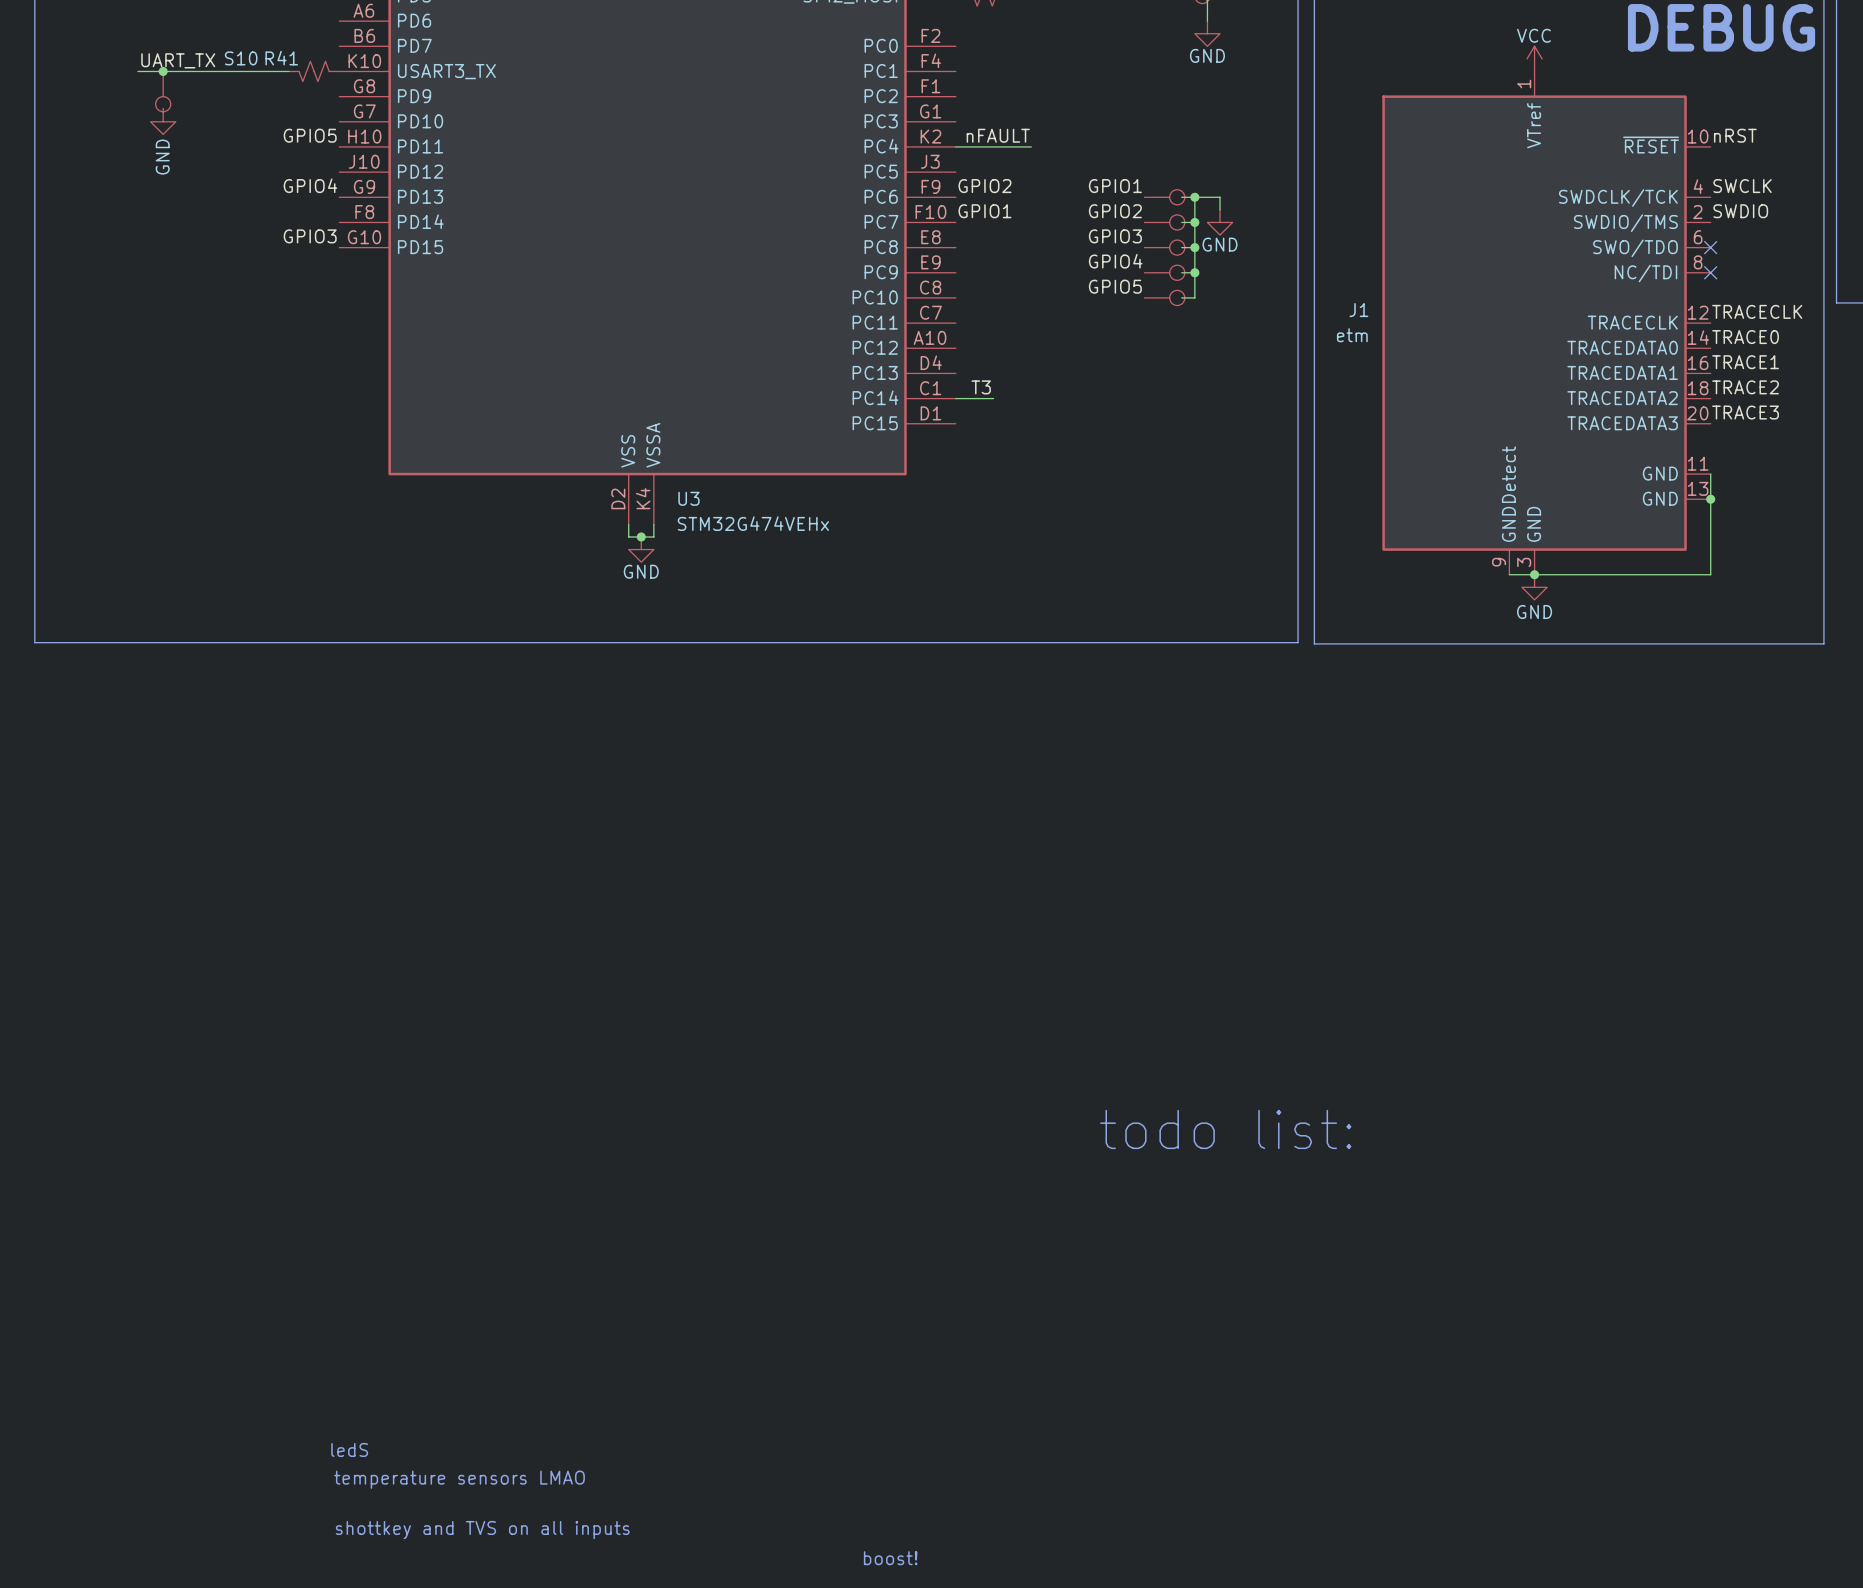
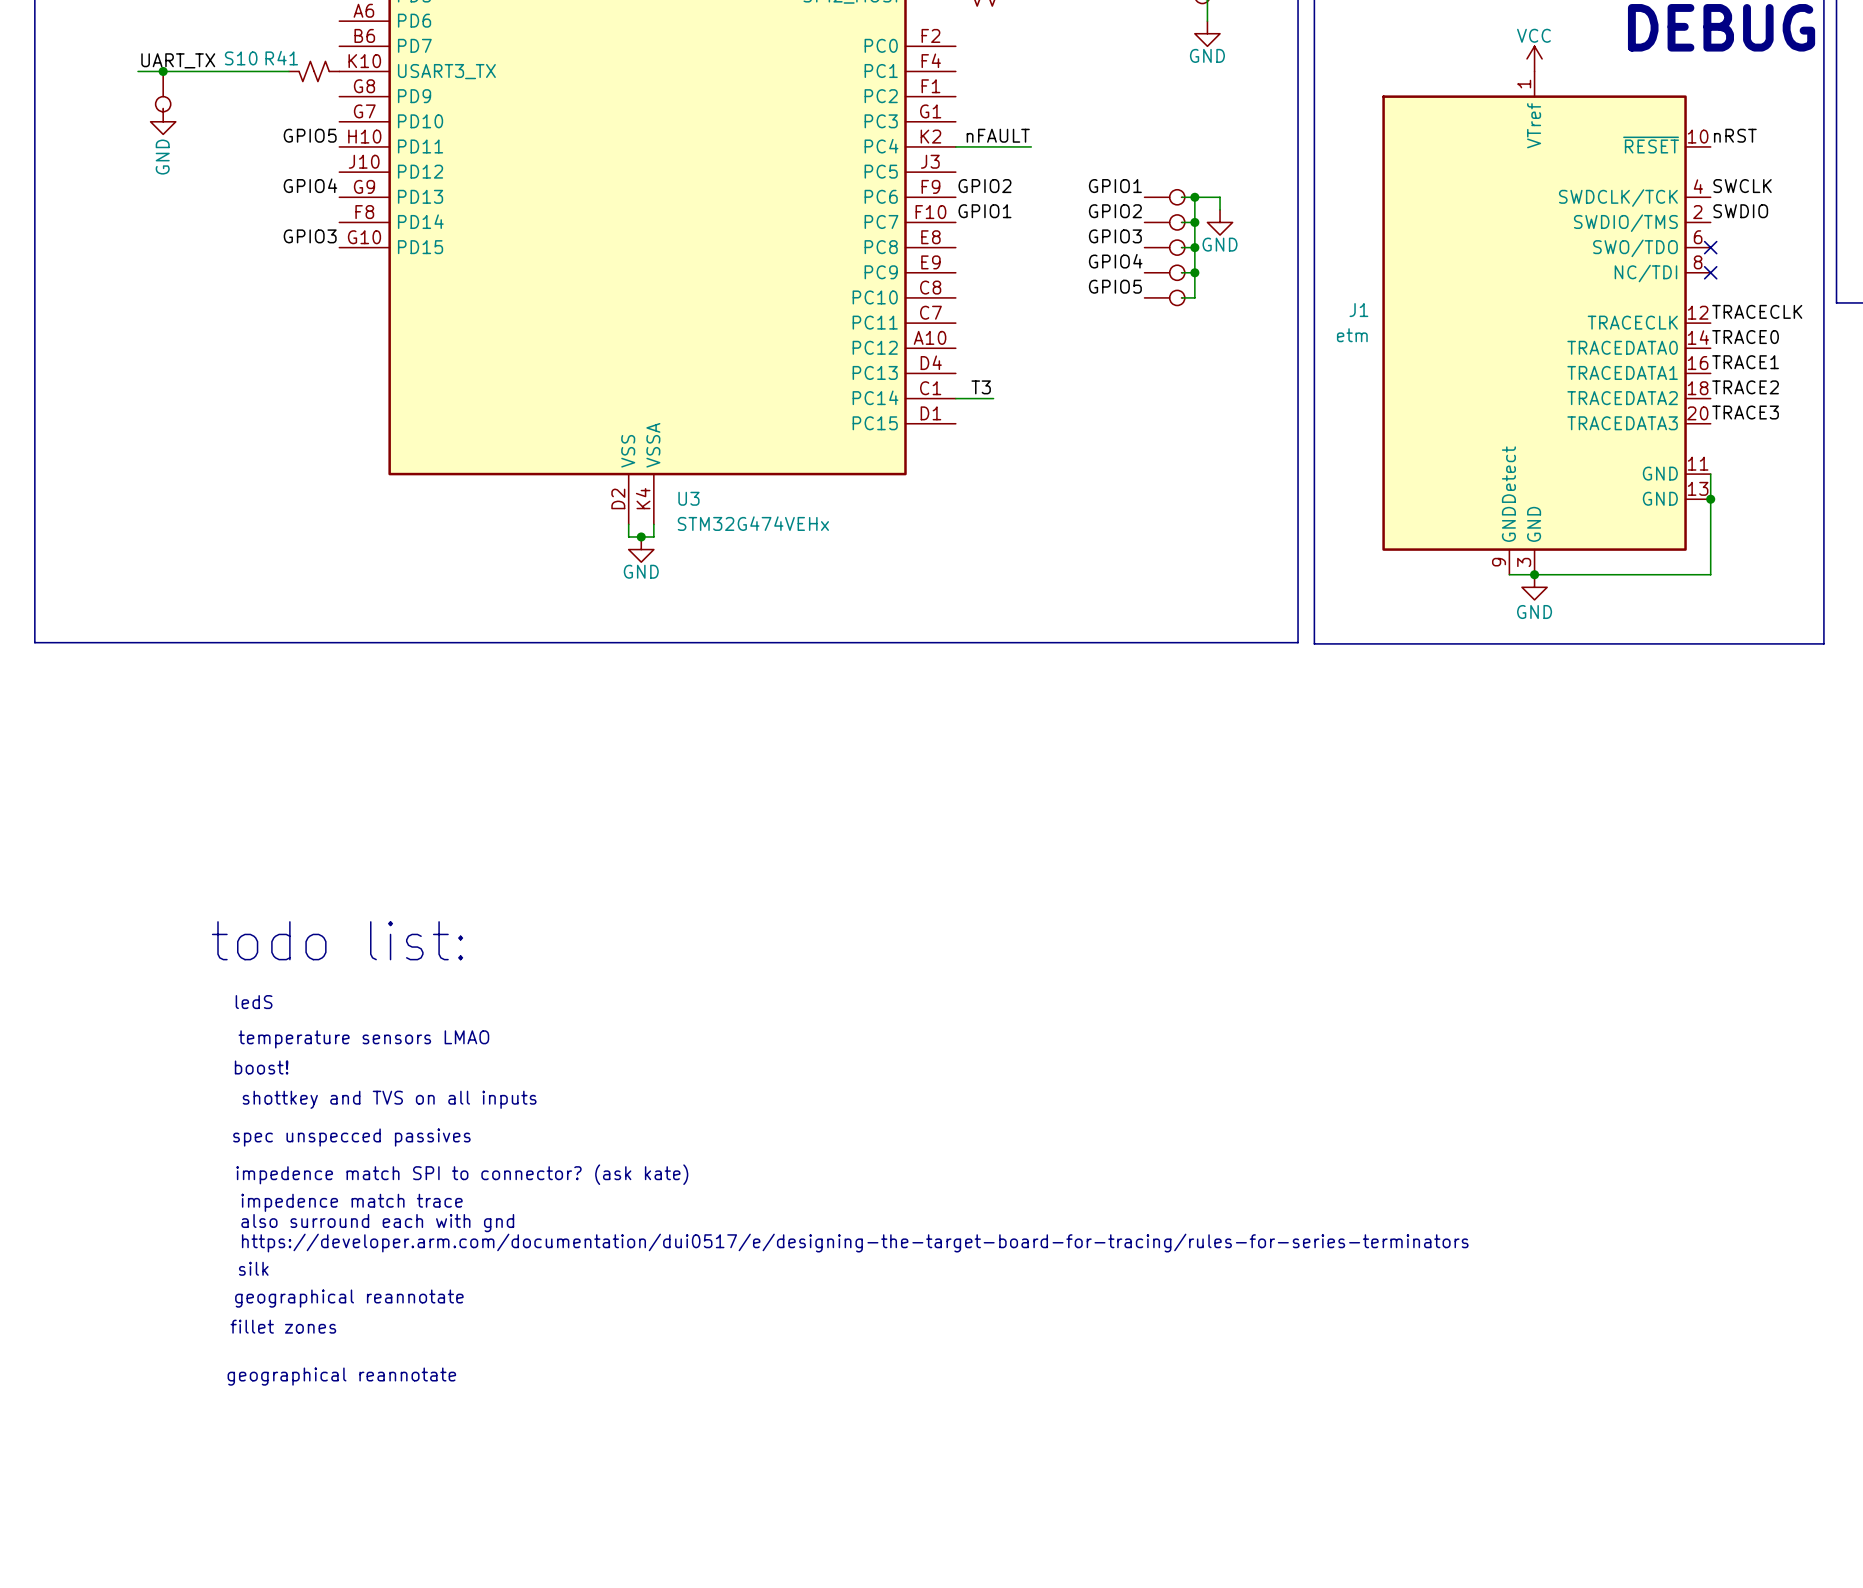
text: none -> todo list: (337, 940)
text: none -> ledS (254, 1002)
text: none -> temperature sensors LMAO (363, 1039)
text: none -> boost! (261, 1067)
text: none -> shottkey and TVS on all inputs (389, 1099)
text: todo list: (1225, 1129) -> none
text: none -> spec unspecced passives (351, 1137)
text: none -> impedence match SPI to connector? (ask kate) (462, 1174)
text: none -> impedence match trace (351, 1202)
text: none -> also surround each with gnd (377, 1223)
text: none -> https://developer.arm.com/documentation/dui0517/e/designing-the-target-board-for-tracing/rules-for-series-terminators (855, 1243)
text: none -> silk (253, 1268)
text: none -> geographical reannotate (349, 1298)
text: none -> fillet zones (283, 1326)
text: none -> geographical reannotate (341, 1376)
text: ledS (349, 1449) -> none
text: temperature sensors LMAO (459, 1479) -> none
text: shottkey and TVS on all inputs (482, 1530) -> none
text: boost! (890, 1558) -> none

